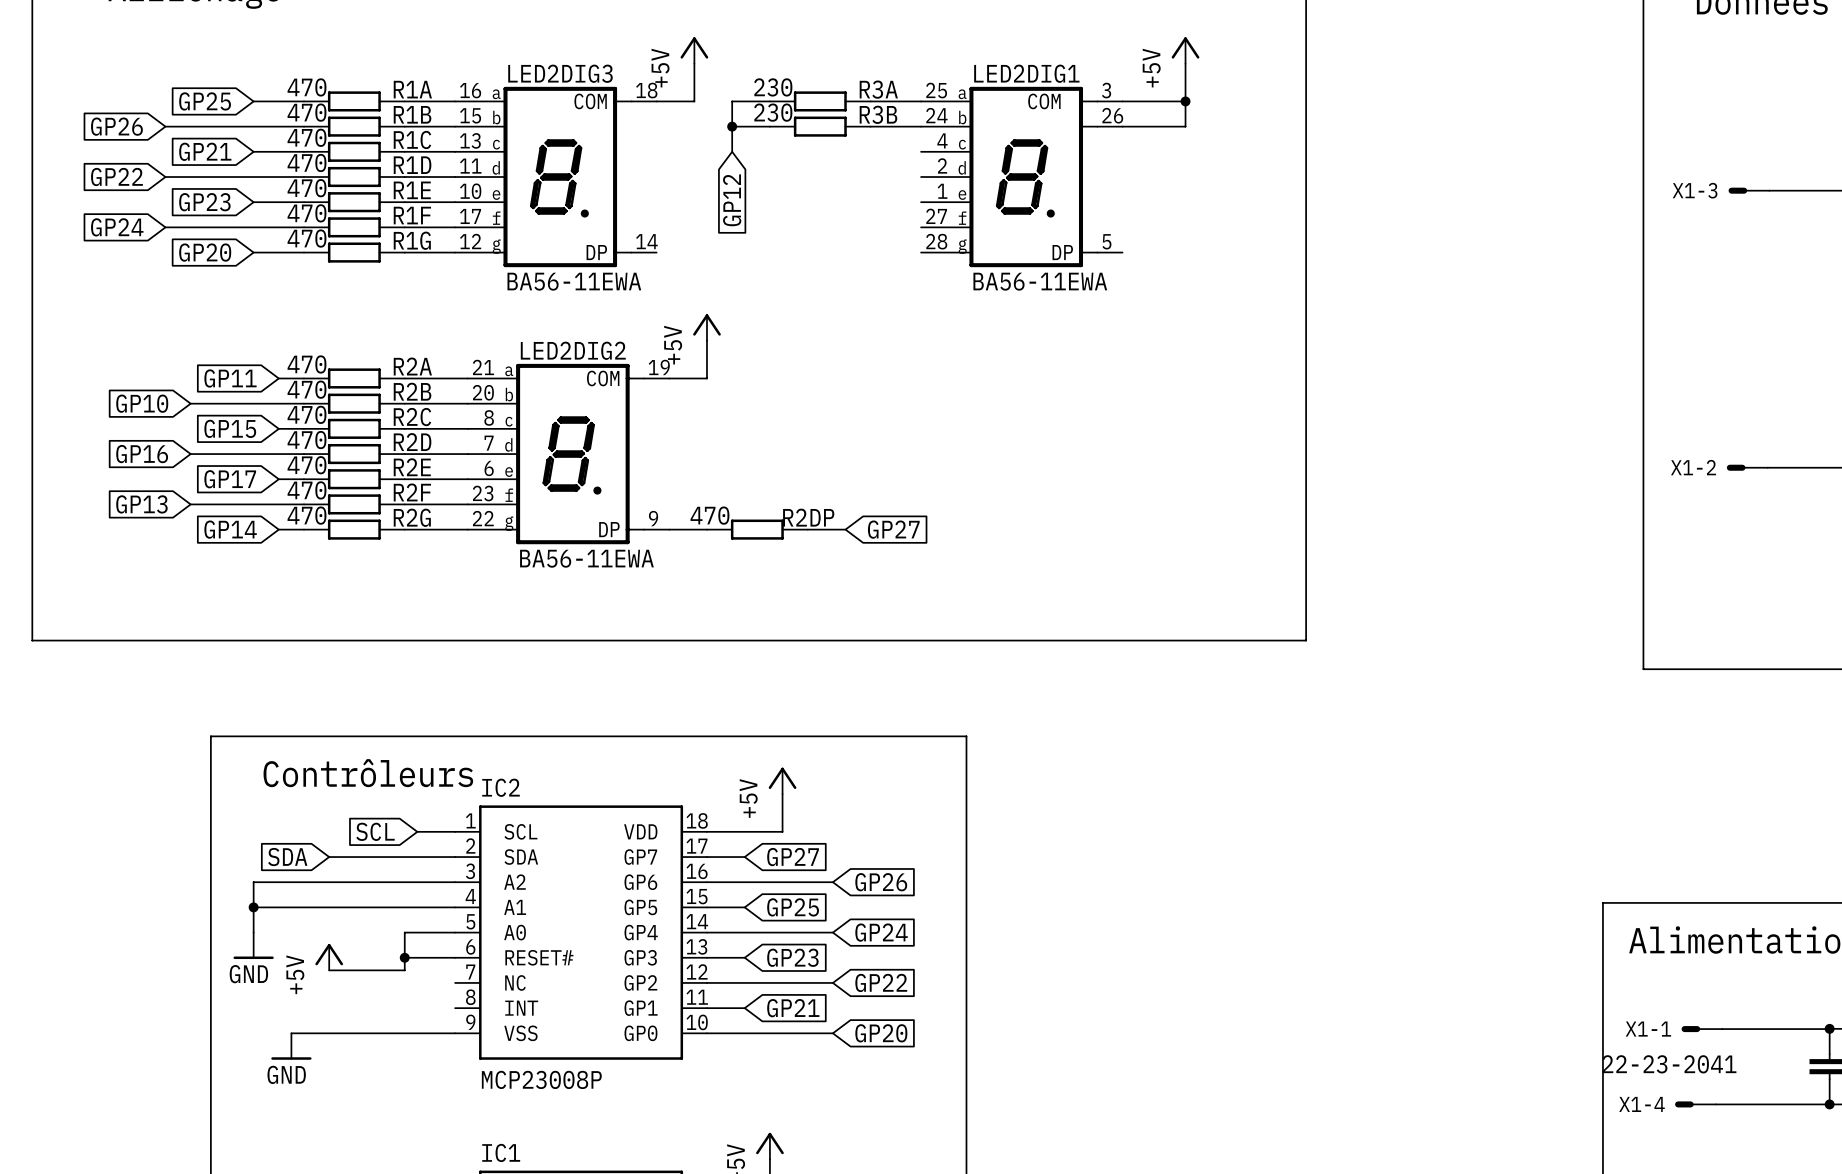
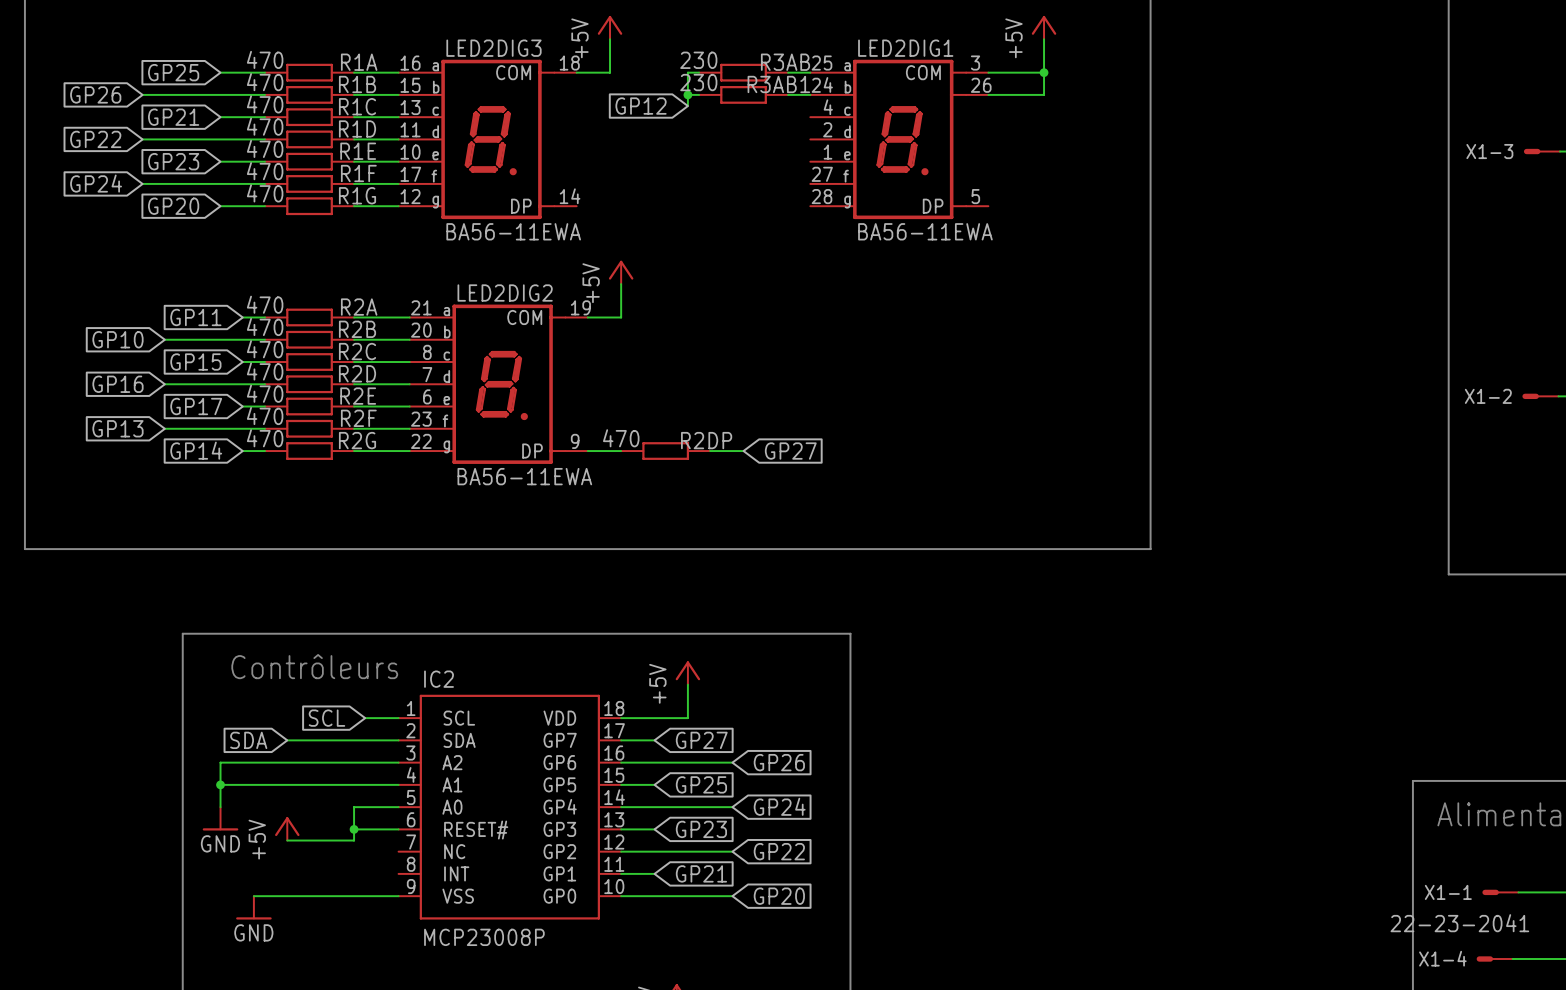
wire: (769, 101) (732, 101) (732, 151) -> none
wire: none -> (699, 72) (687, 72) (687, 106)
R3A: 230 (820, 101) -> none
R3AB: none -> 230 (743, 72)
wire: (732, 126) (769, 126) -> none
junction position: (732, 126) -> (687, 94)
R3B: 230 (820, 126) -> none
R3AB1: none -> 230 (743, 94)
global label rotation: 0° (732, 200) -> 90° clockwise (641, 106)

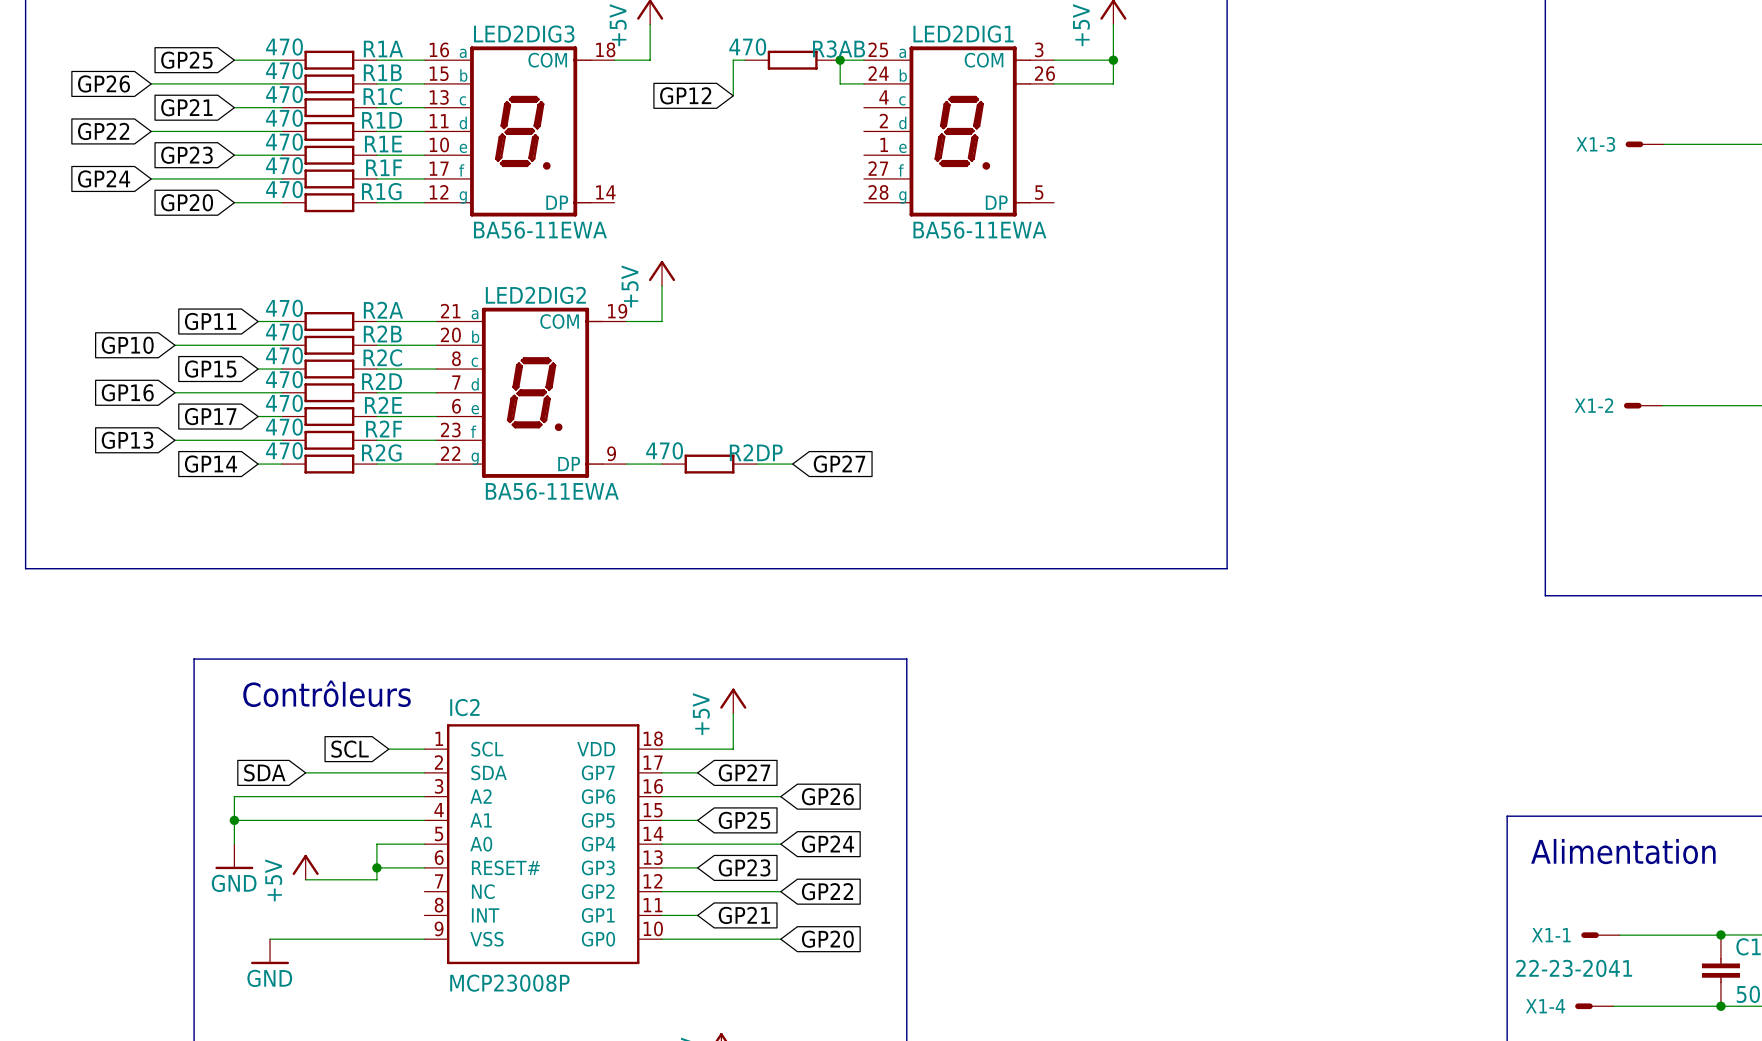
R3AB value: 230 (698, 60) -> 470 (747, 46)
wire: none -> (840, 60) (840, 83)
junction: none -> (840, 60)
wire: (687, 94) (699, 94) -> none
junction: (687, 94) -> none
R3AB1: 230 (743, 94) -> none

